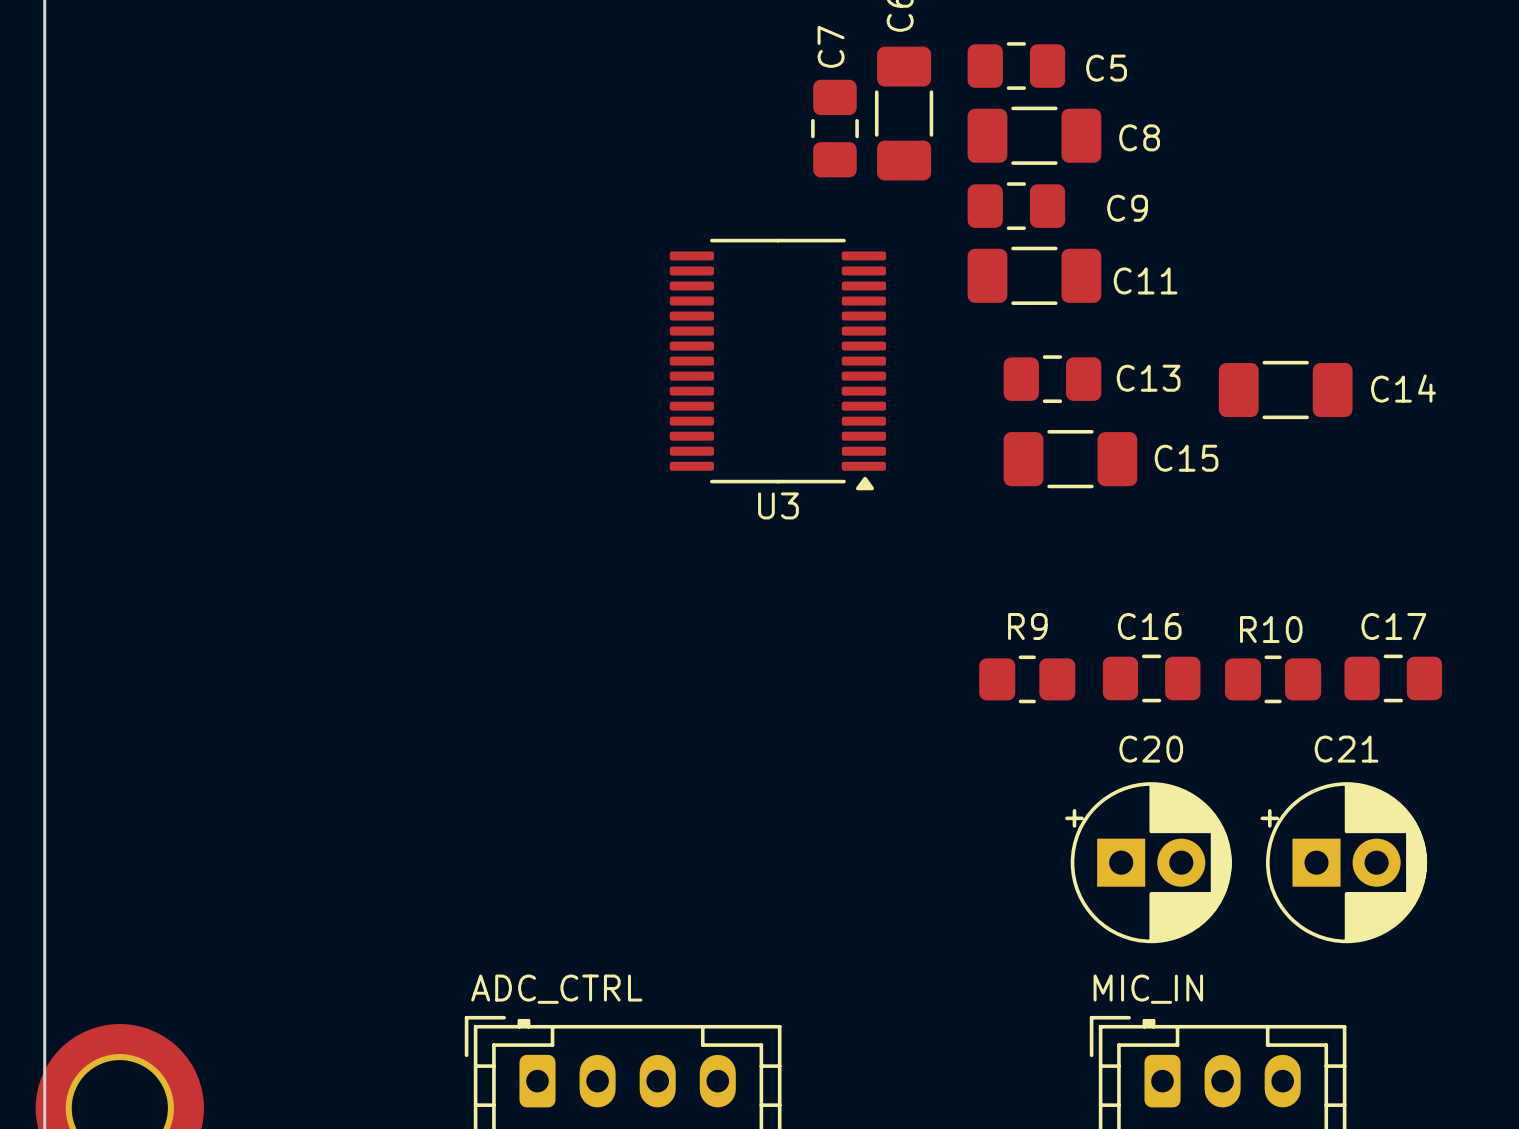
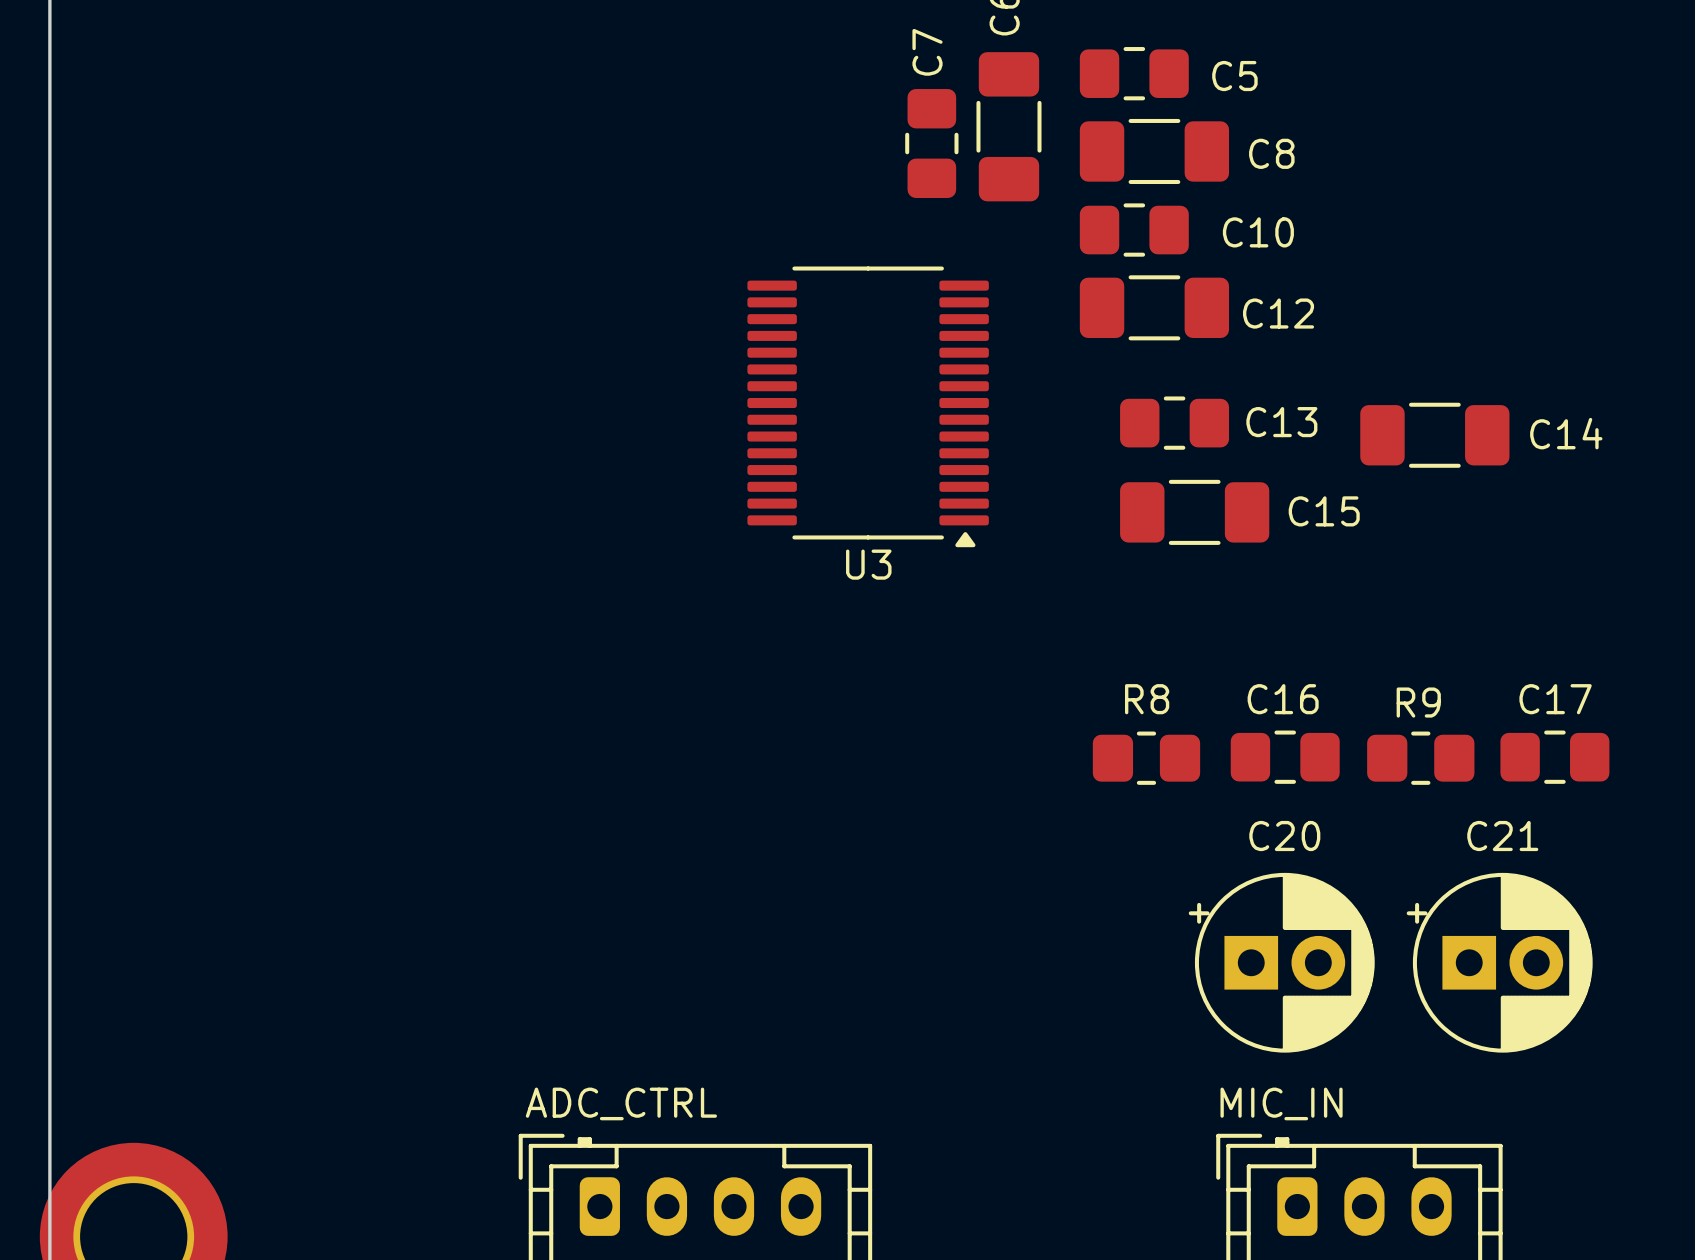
C9 name: C9 (1127, 208) -> C10 (1258, 232)
C11 name: C11 (1145, 280) -> C12 (1278, 313)
R9 name: R9 (1027, 626) -> R8 (1147, 699)
R10 name: R10 (1271, 629) -> R9 (1418, 702)

